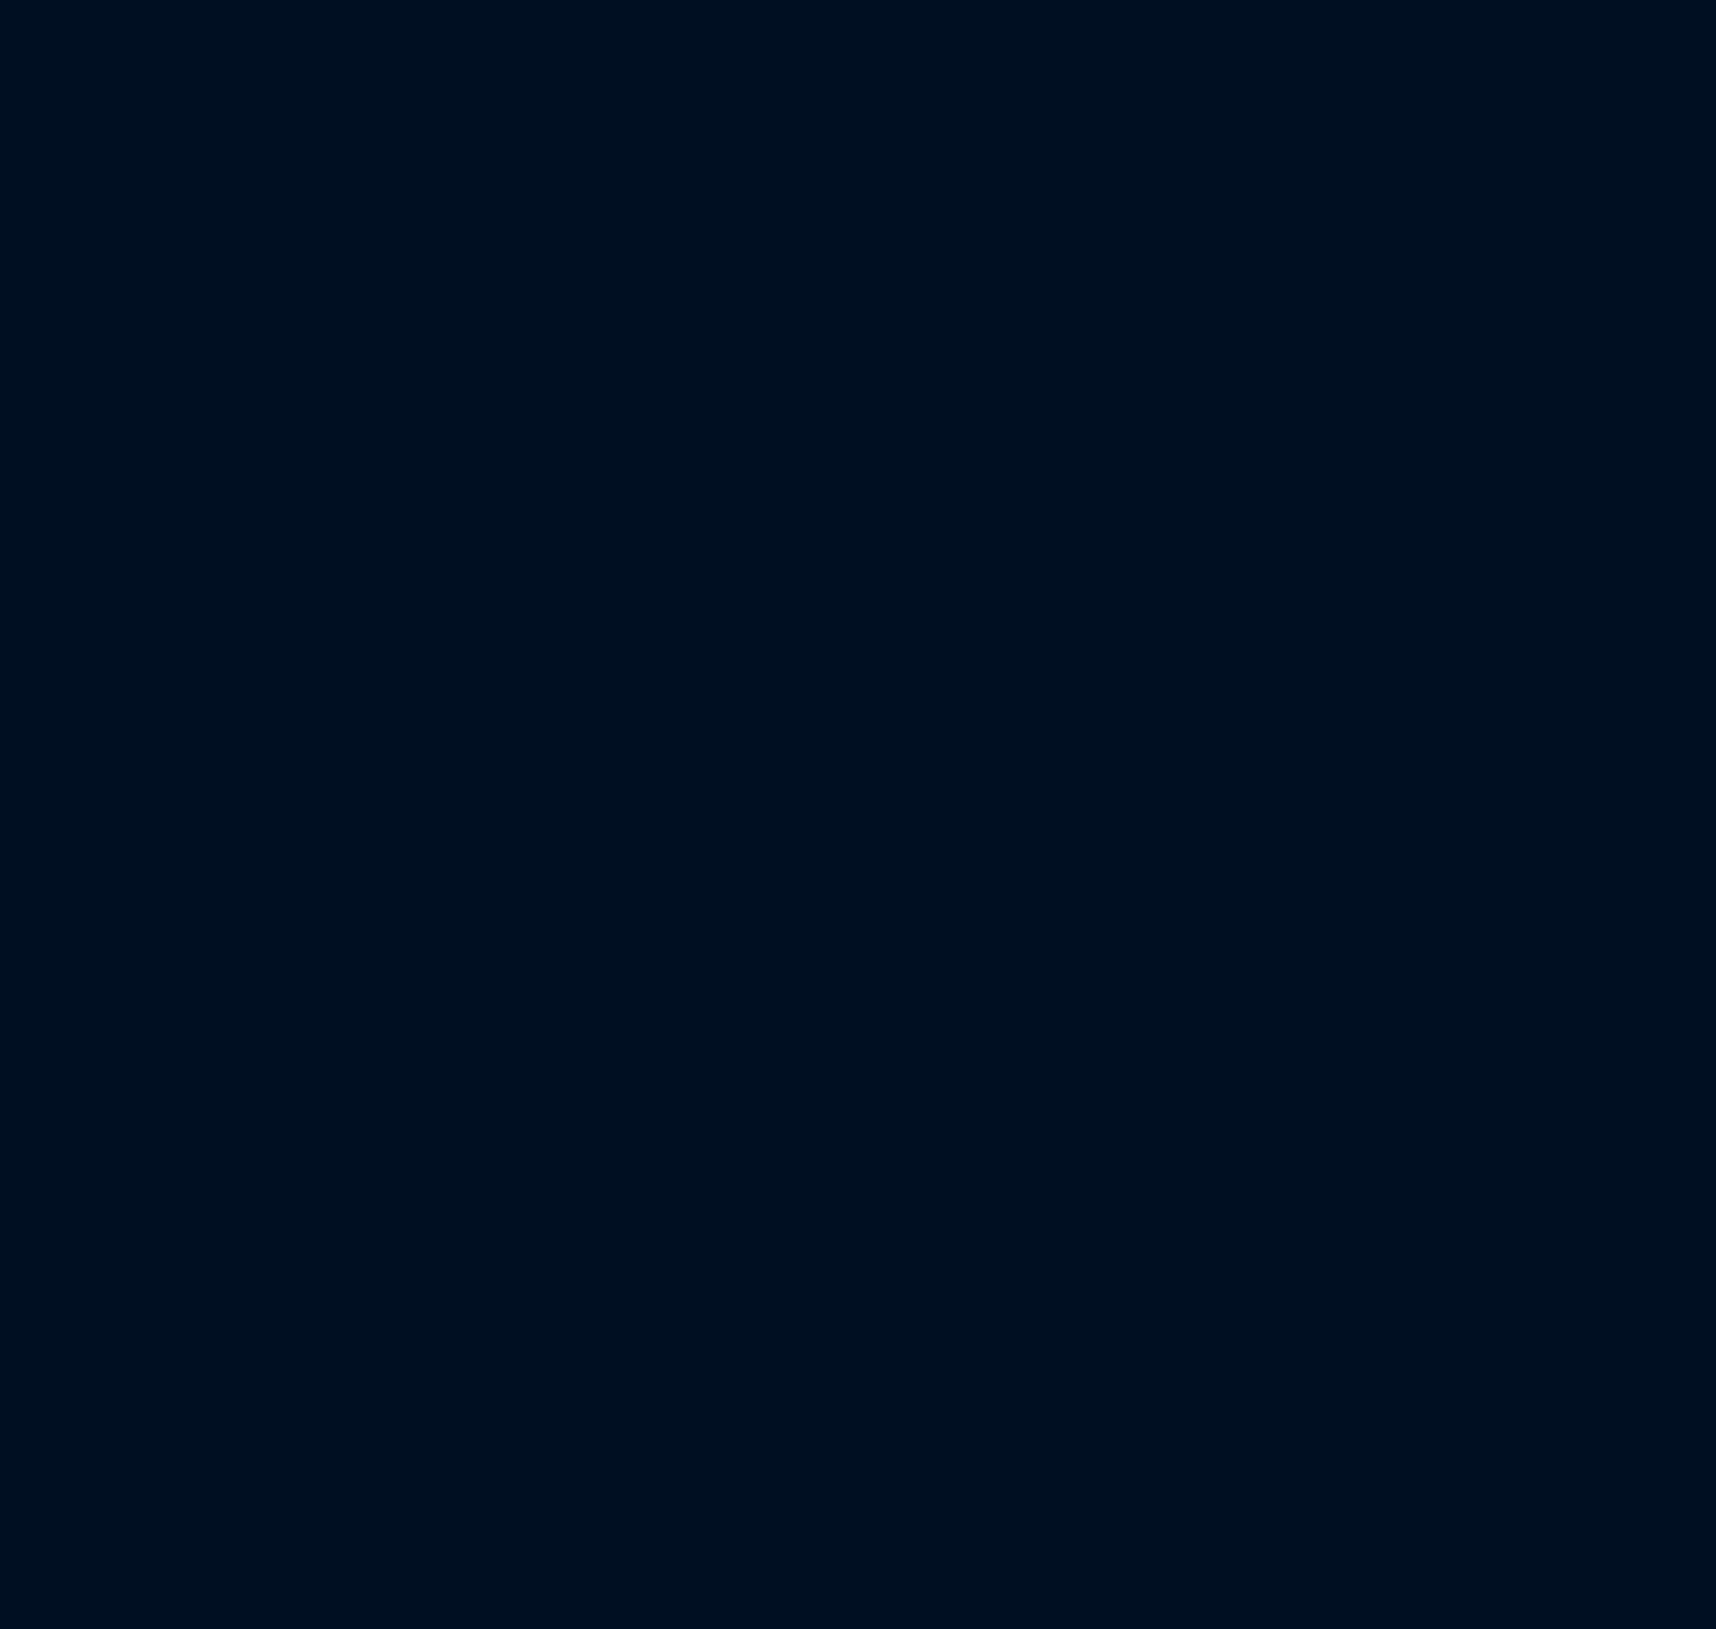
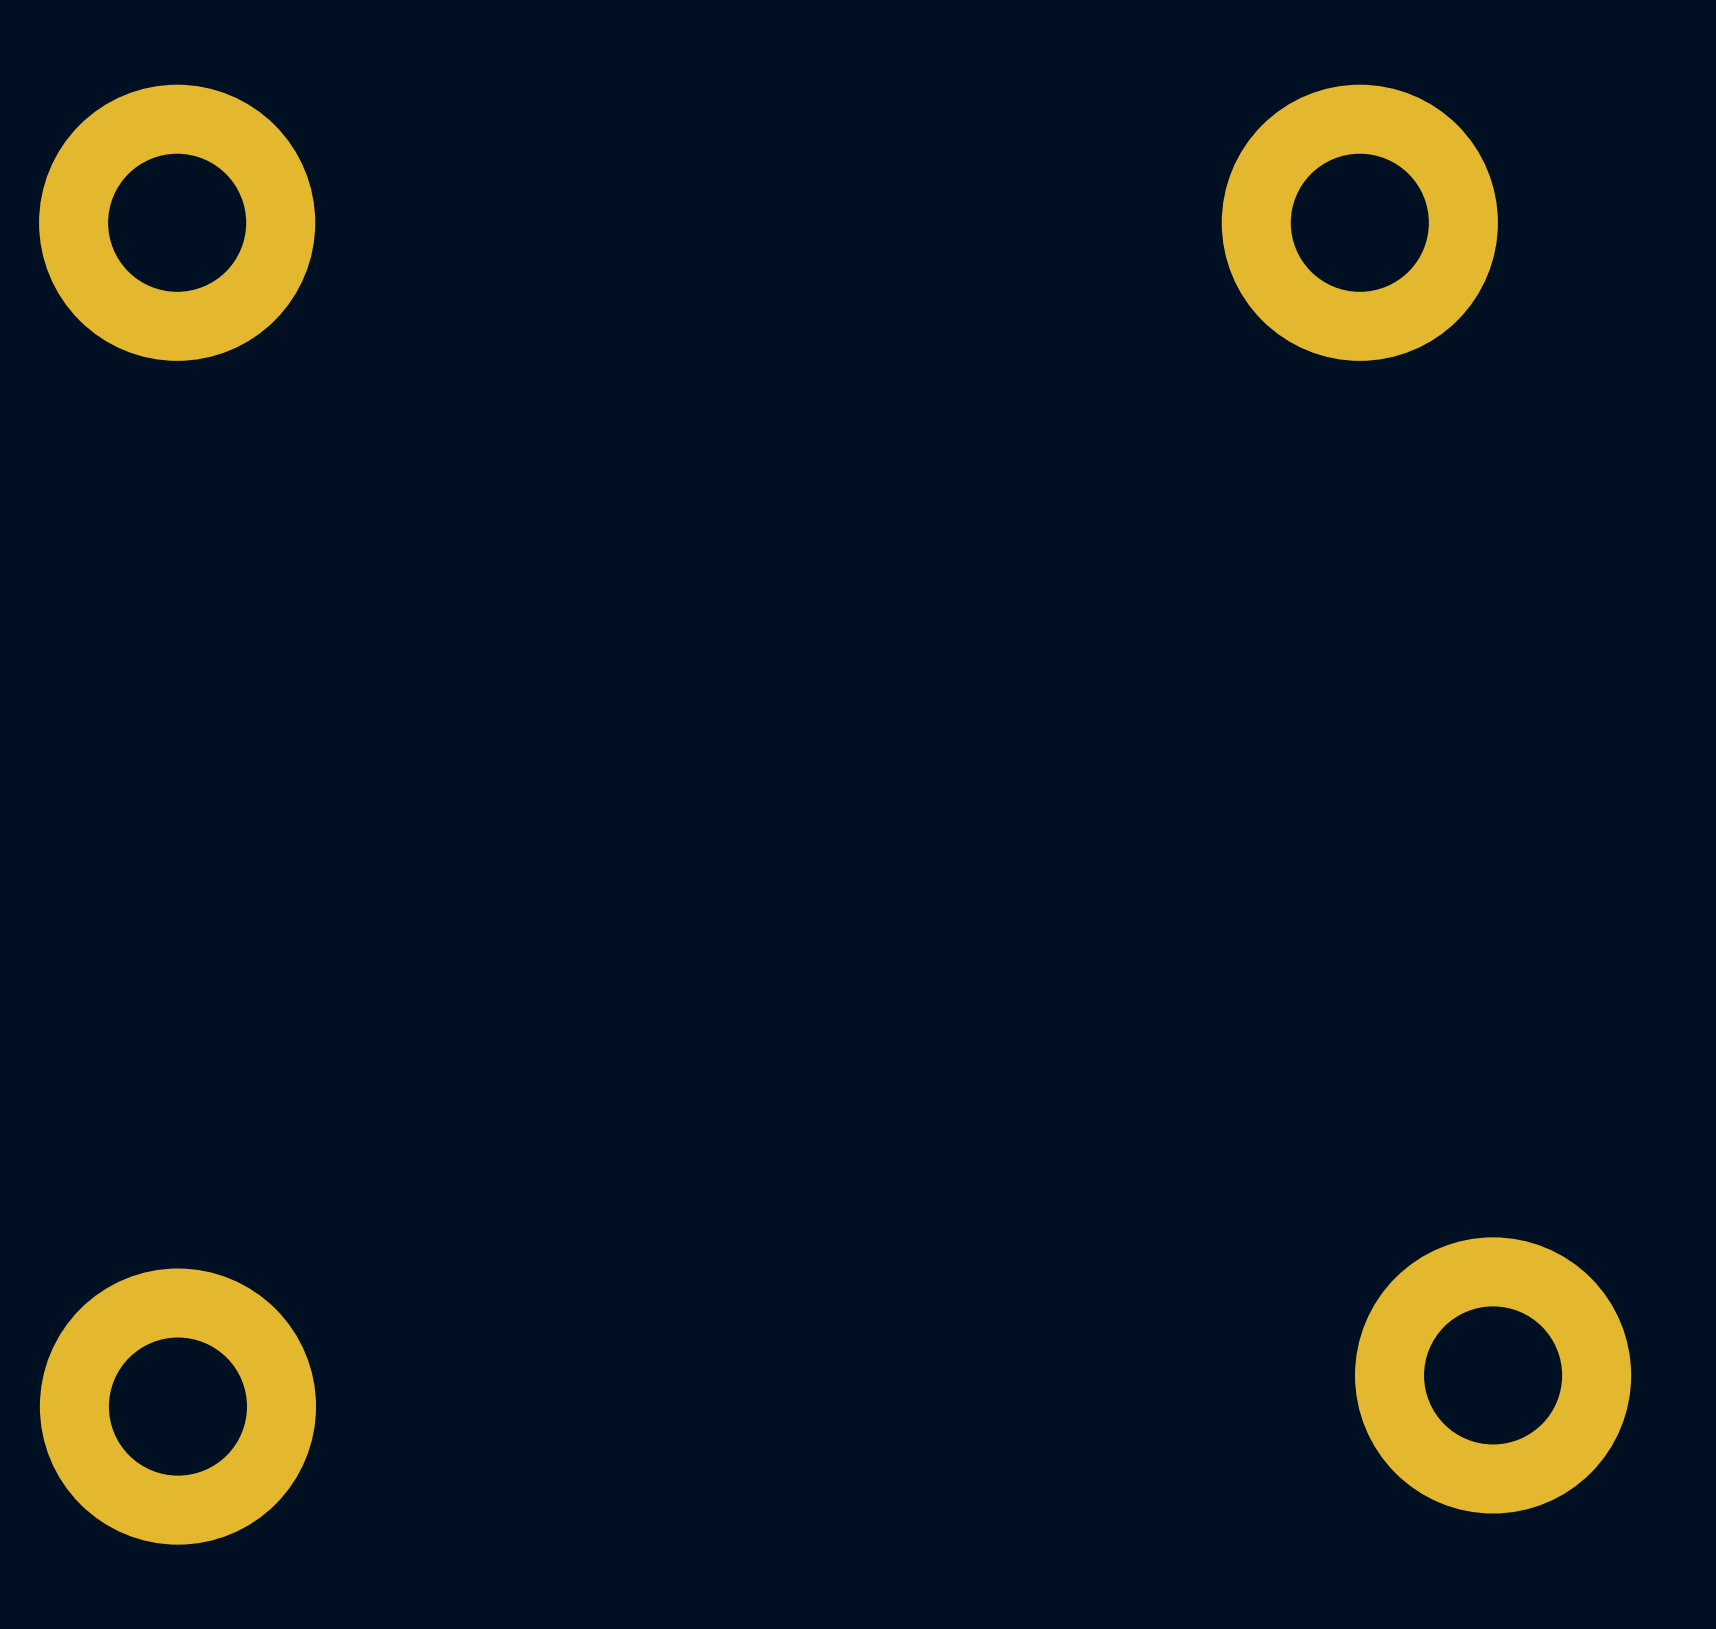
part: none -> (177, 222)
part: none -> (1359, 222)
part: none -> (1493, 1375)
part: none -> (177, 1406)

